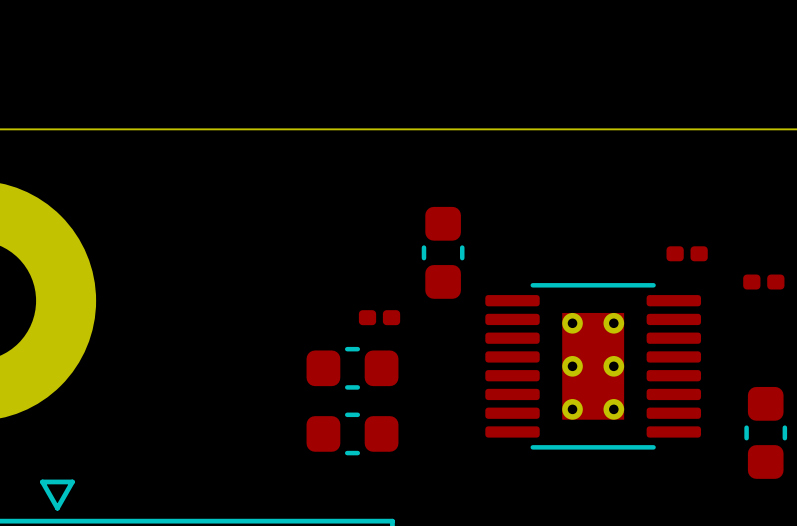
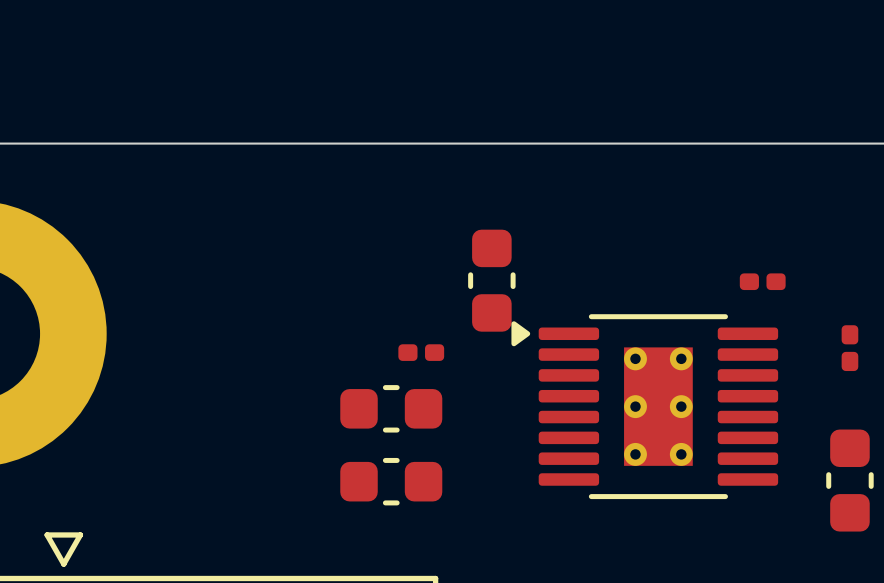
part rotation: 0° (763, 282) -> 90° clockwise (849, 348)
part position: (763, 282) -> (849, 348)
part footprint: [485, 283, 702, 450] -> [511, 314, 779, 500]

